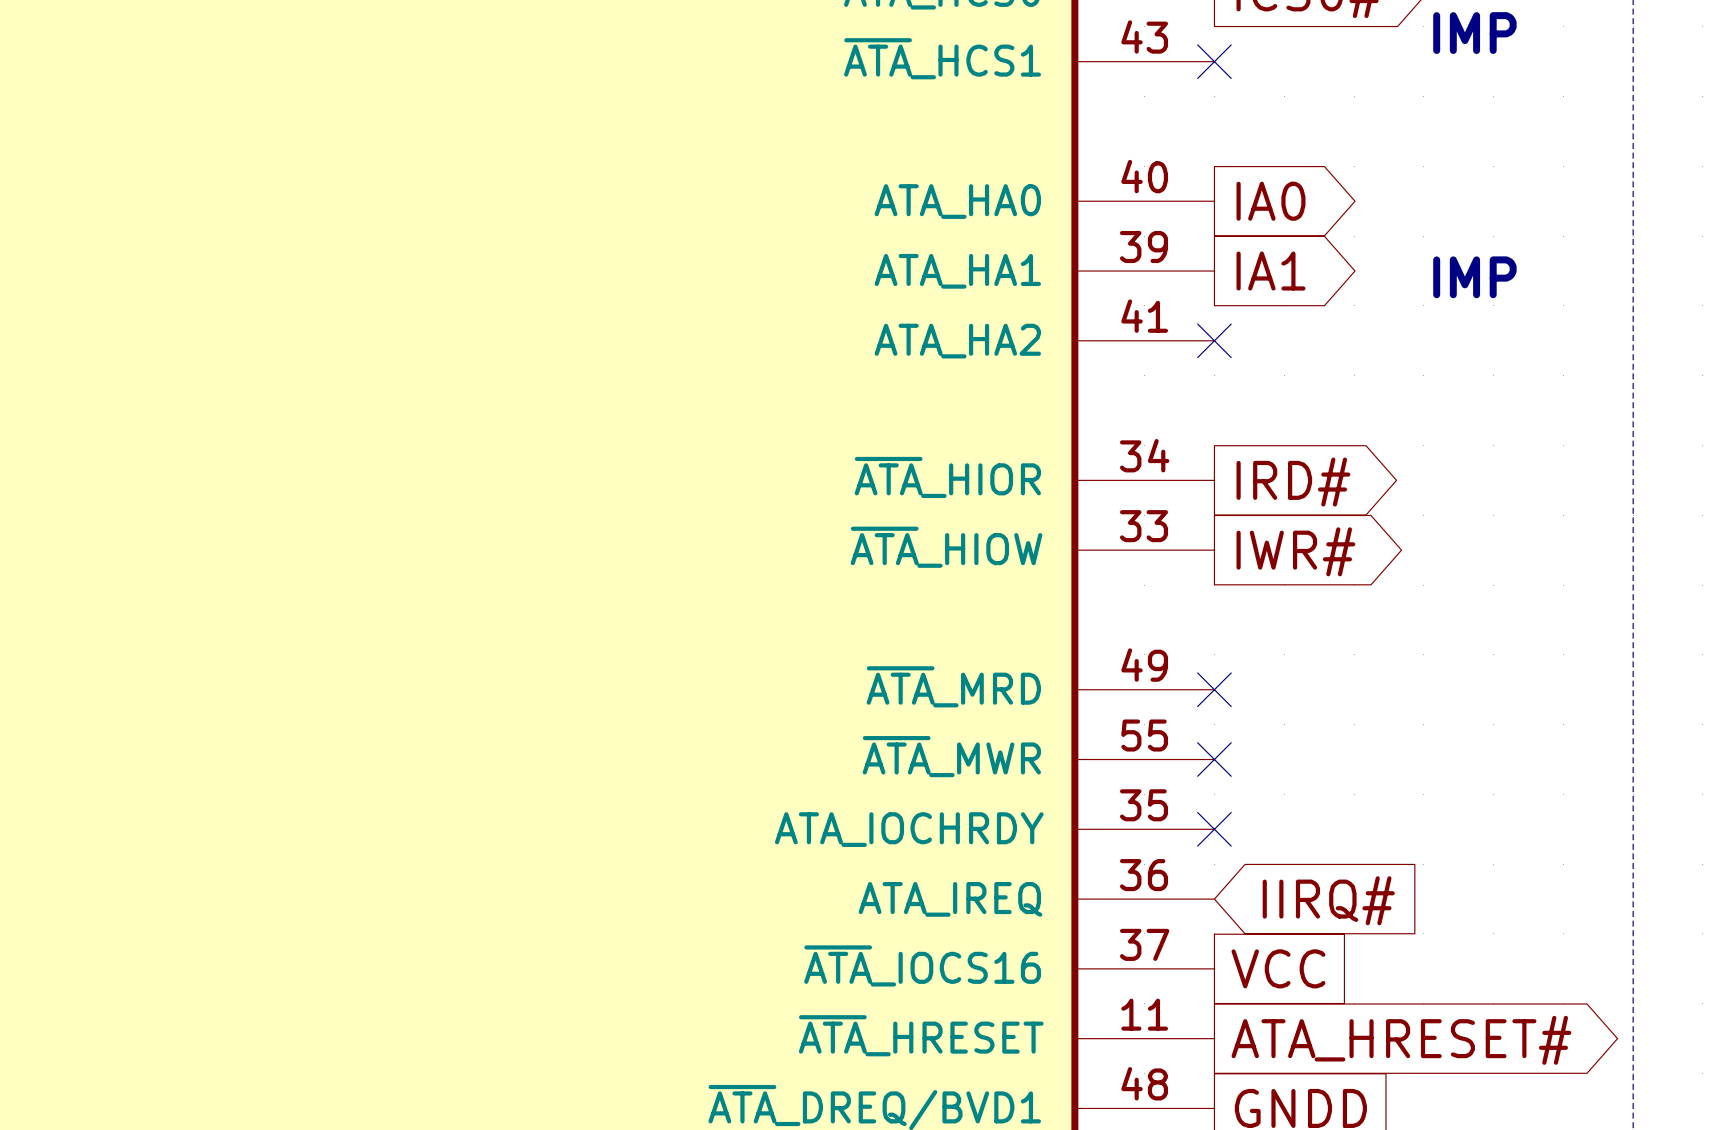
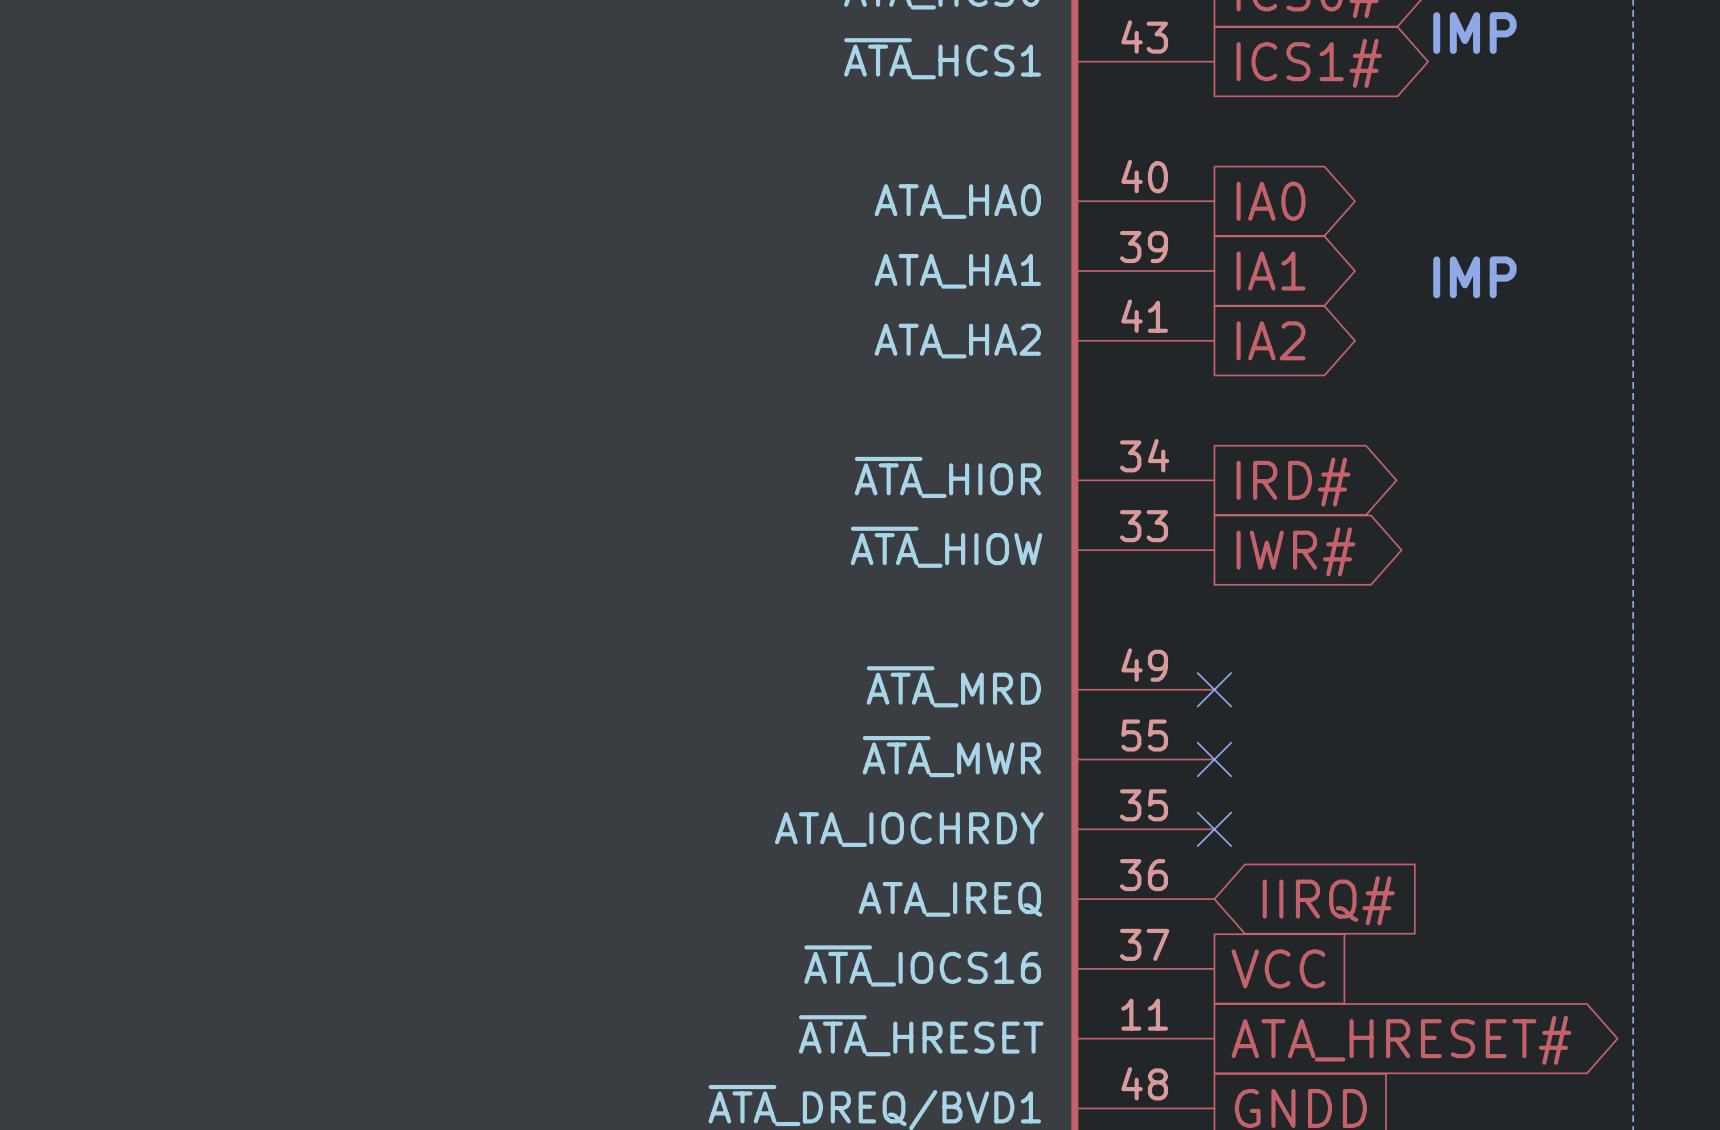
no-connect mark: (1214, 61) -> none
global label: none -> ICS1# (1309, 63)
no-connect mark: (1214, 340) -> none
global label: none -> IA2 (1270, 340)

